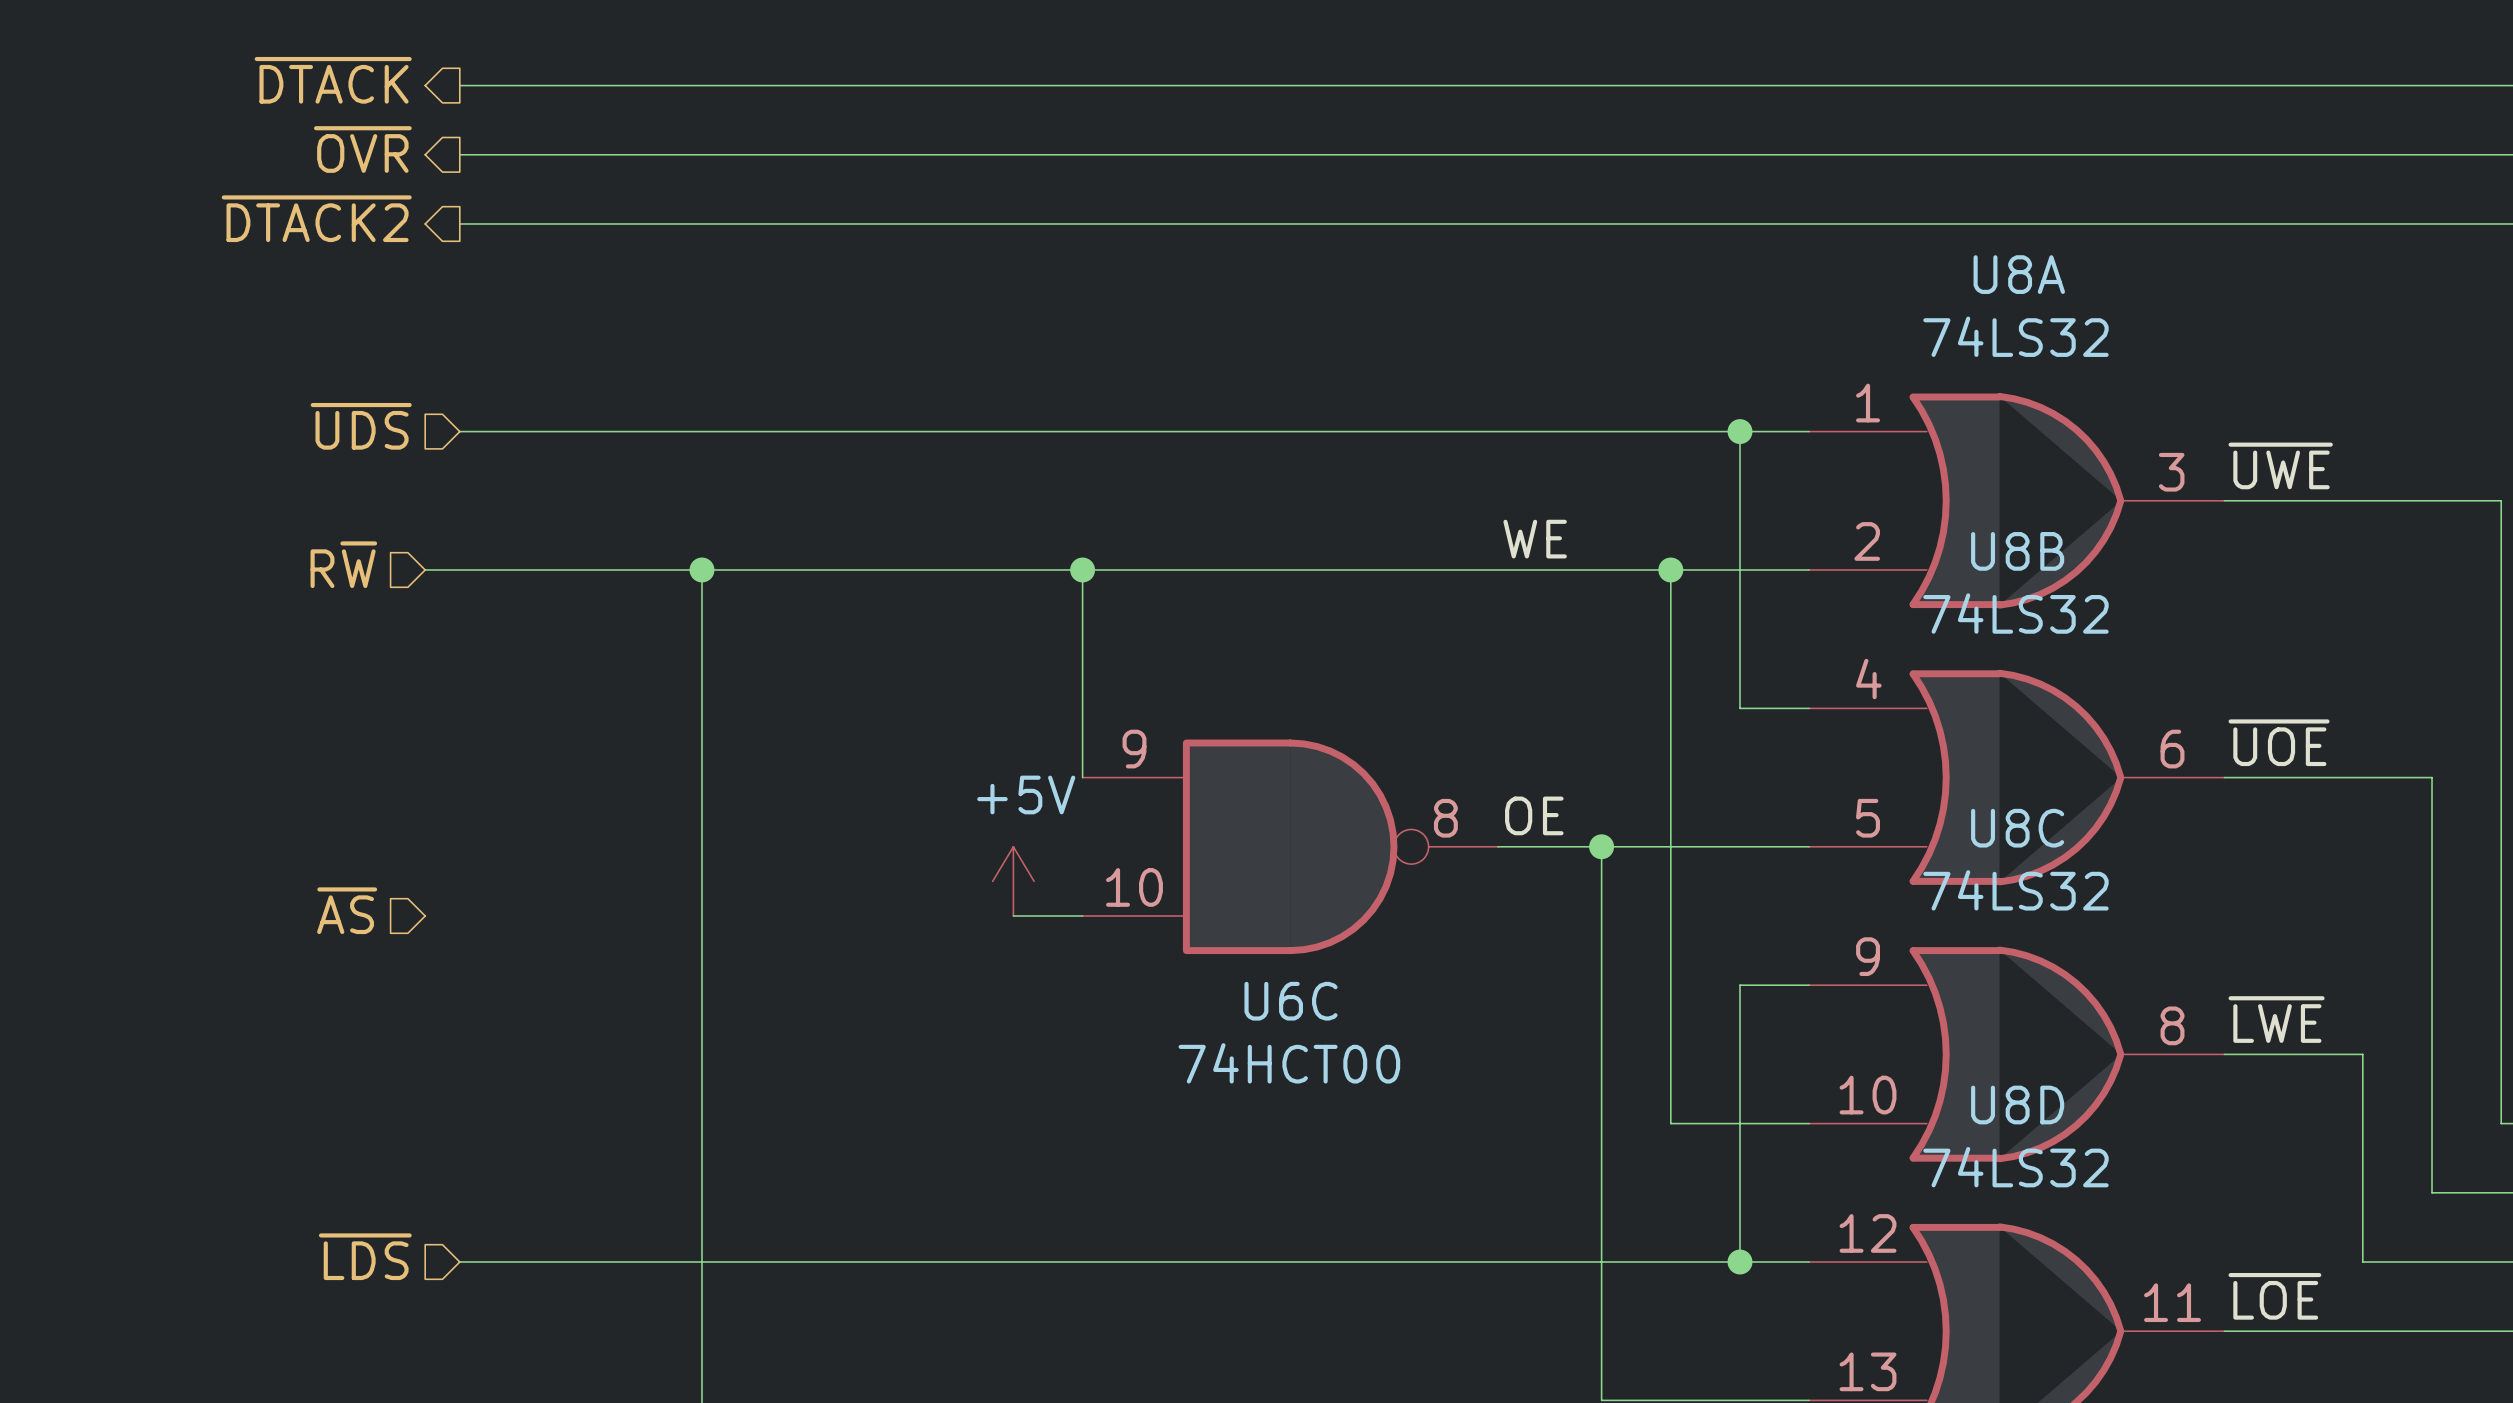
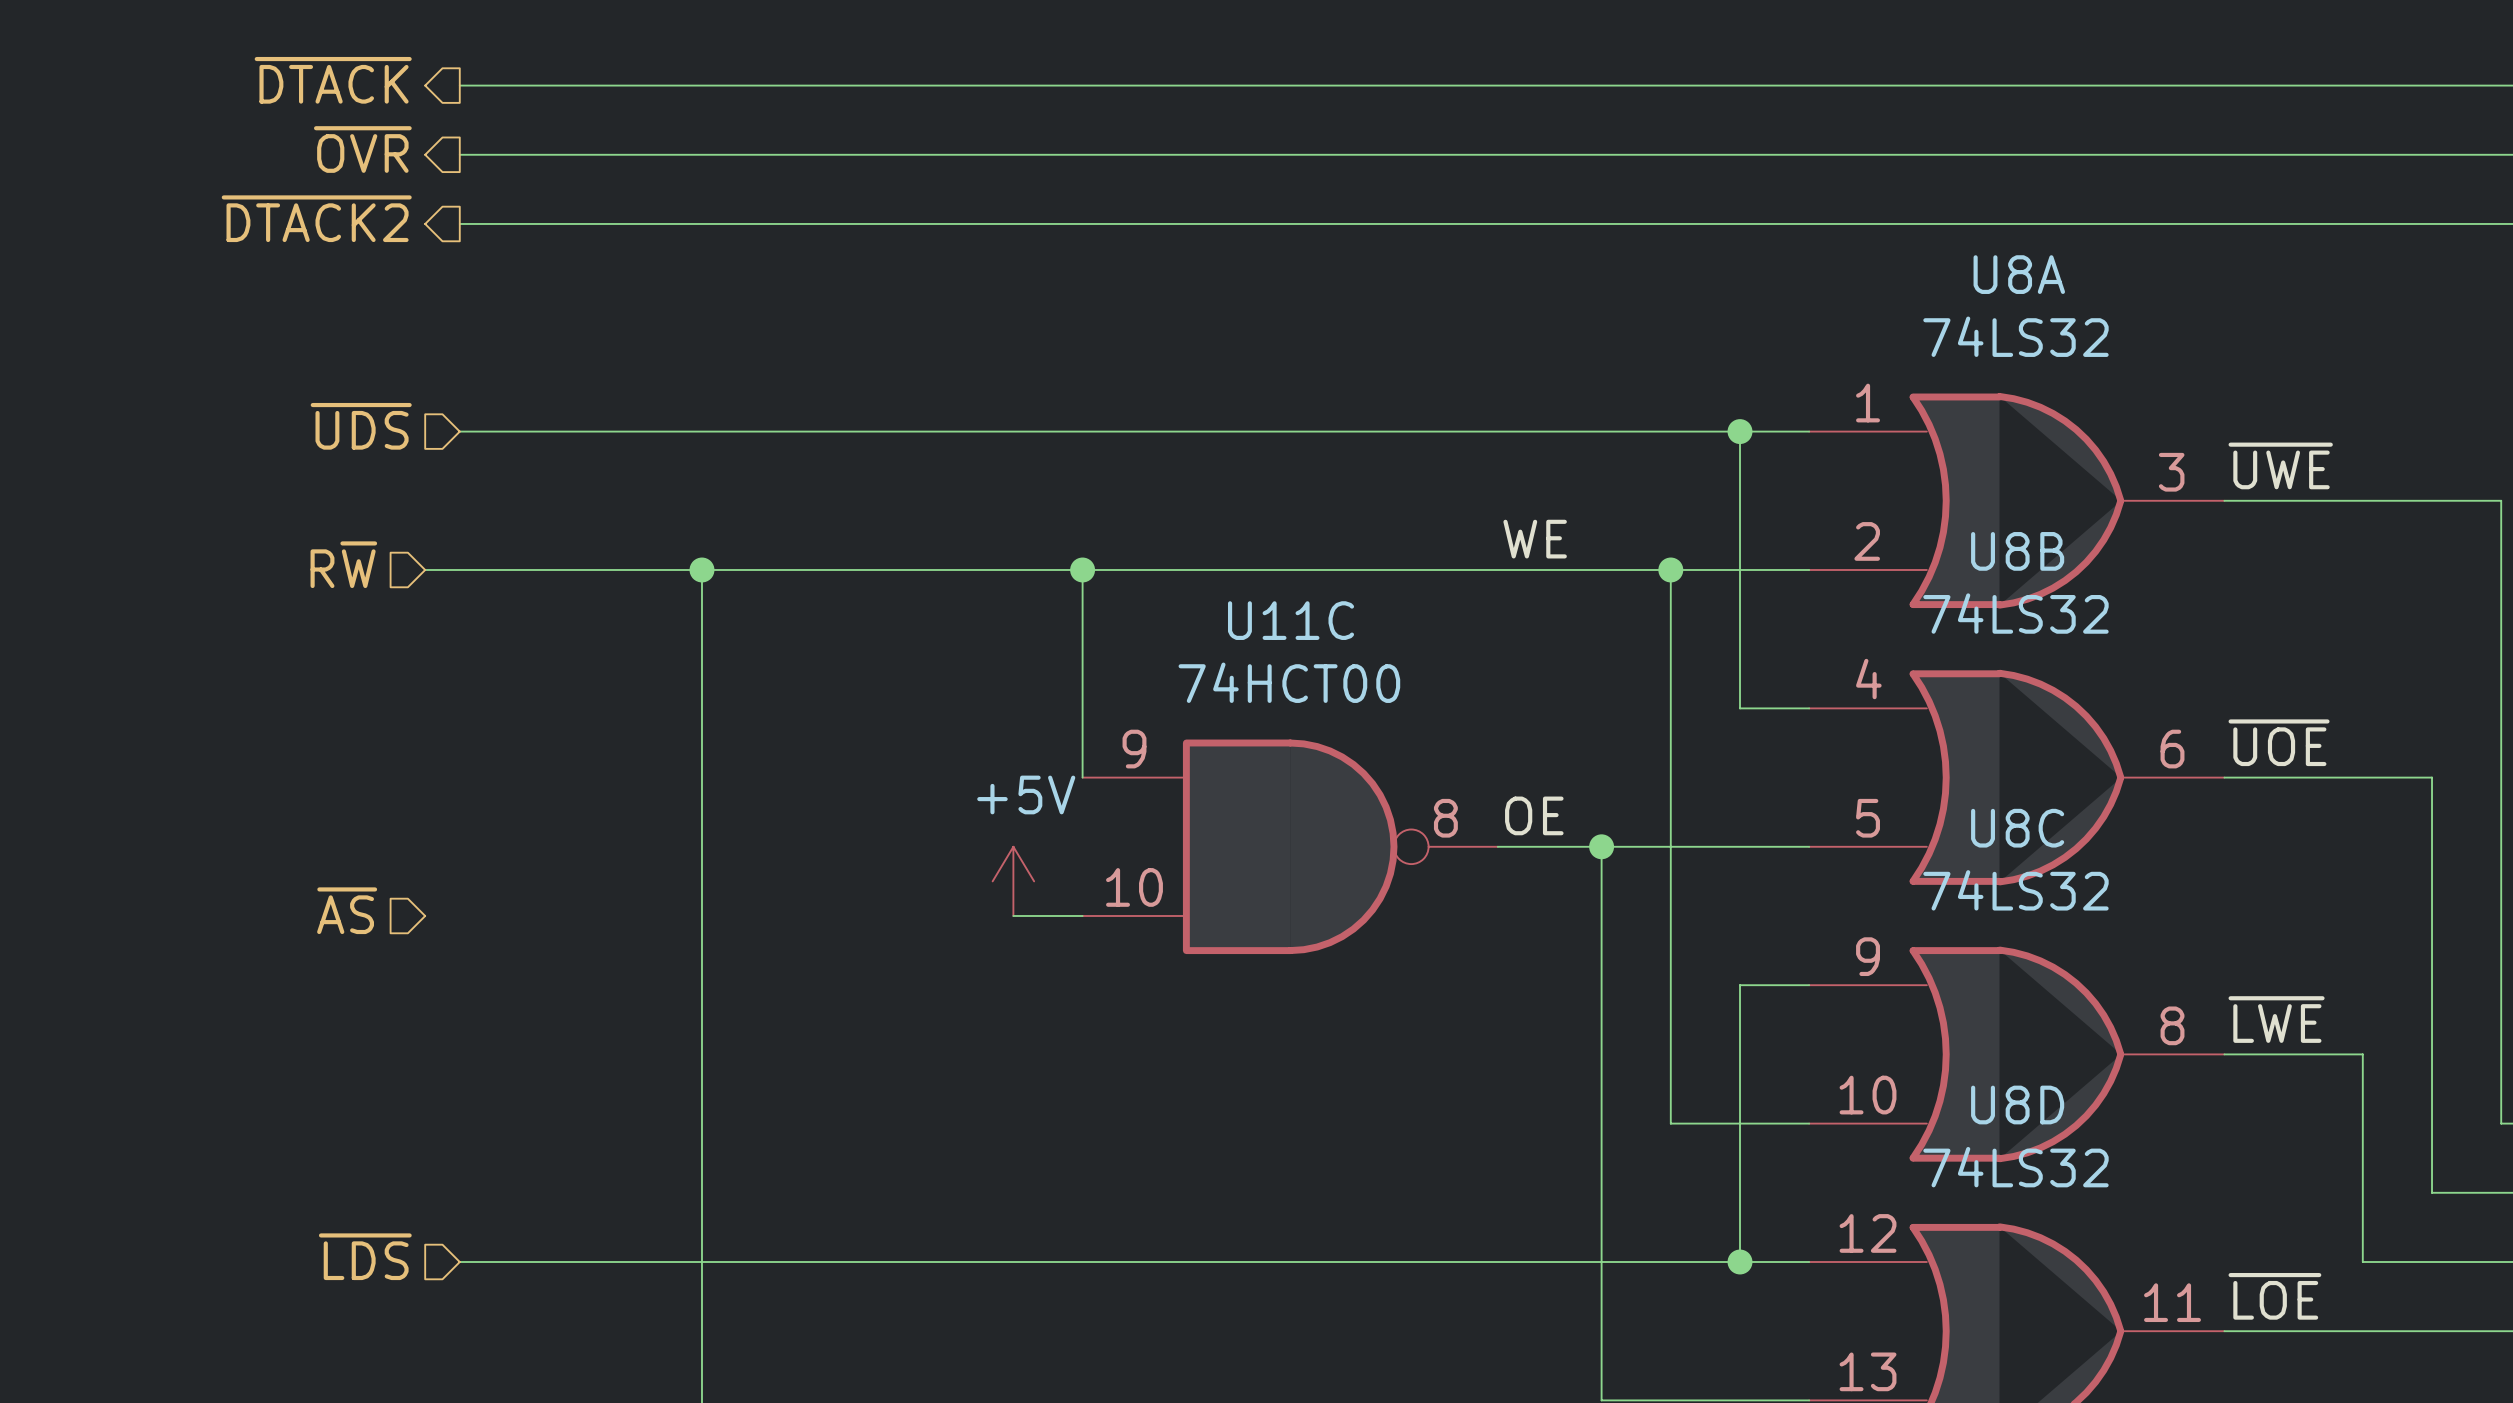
U6C name: U6C (1291, 1001) -> U11C (1291, 620)
U6C value position: 74HCT00 (1289, 1063) -> 74HCT00 (1289, 682)

